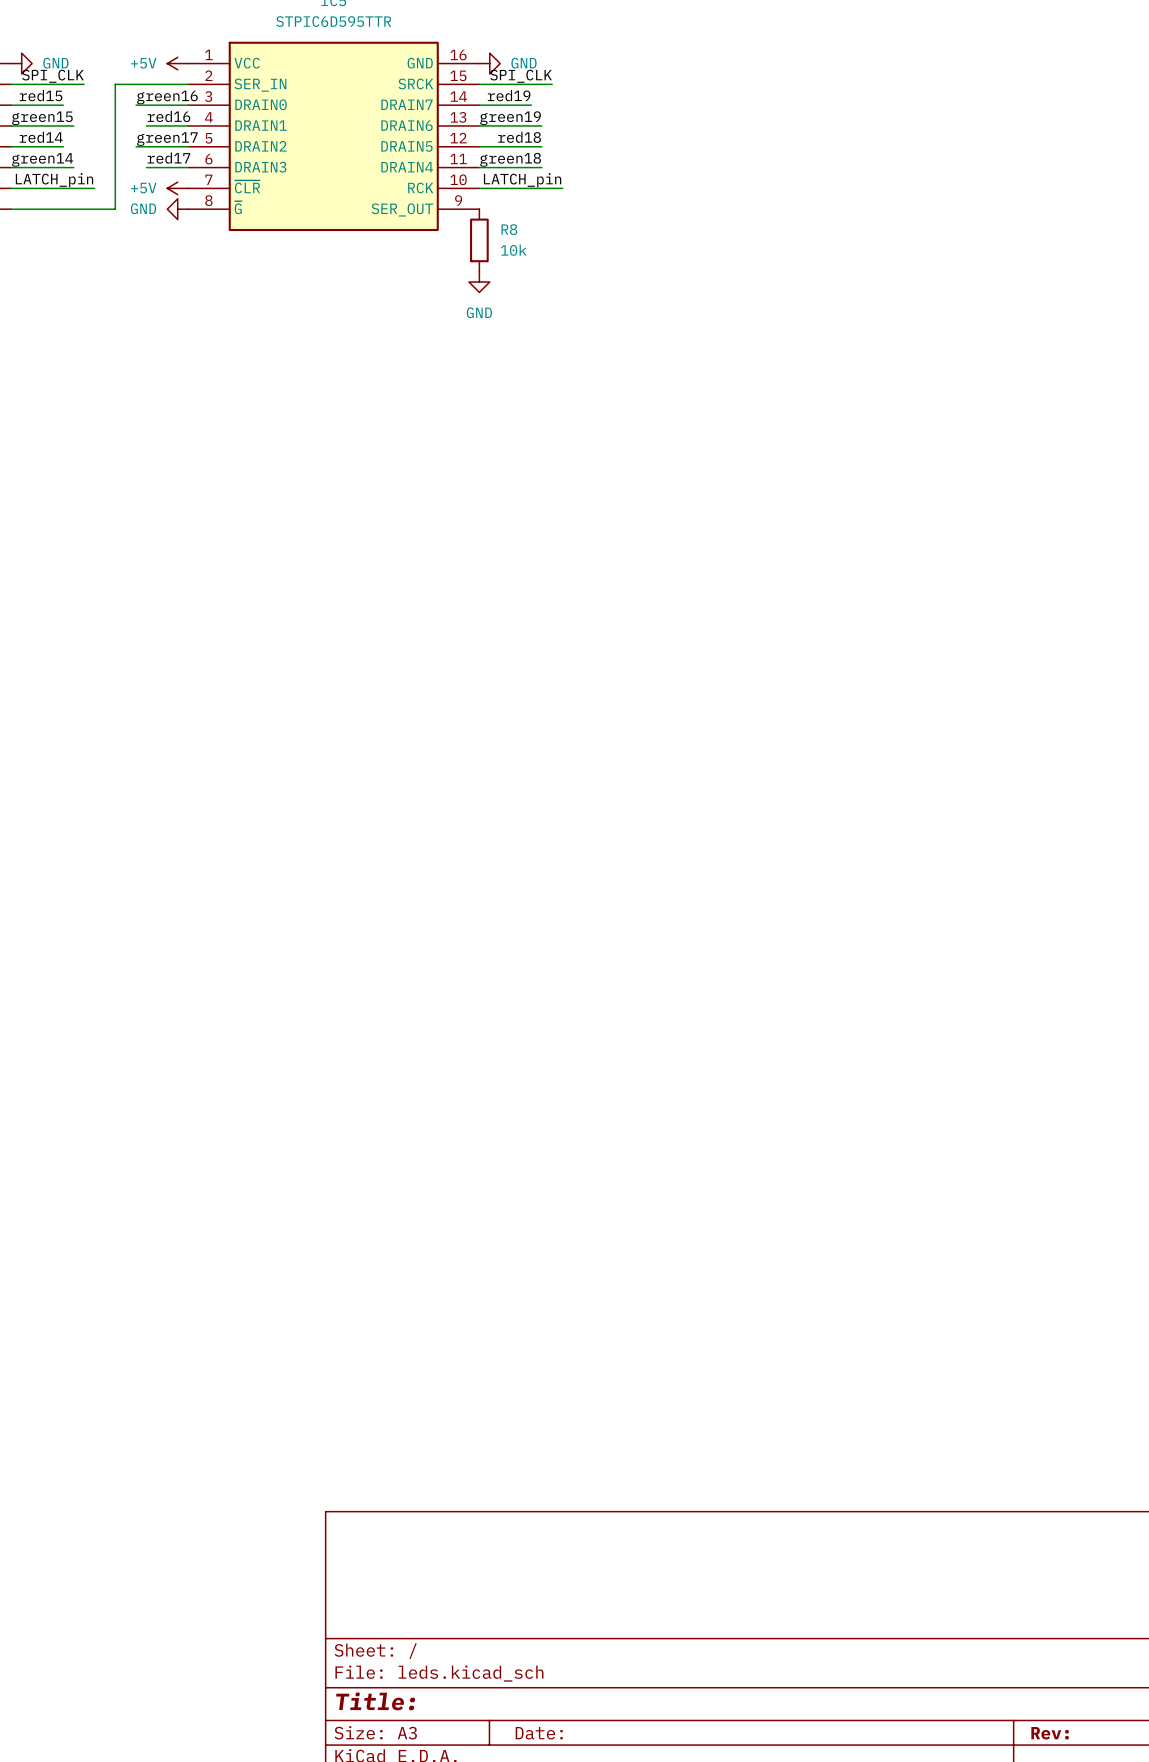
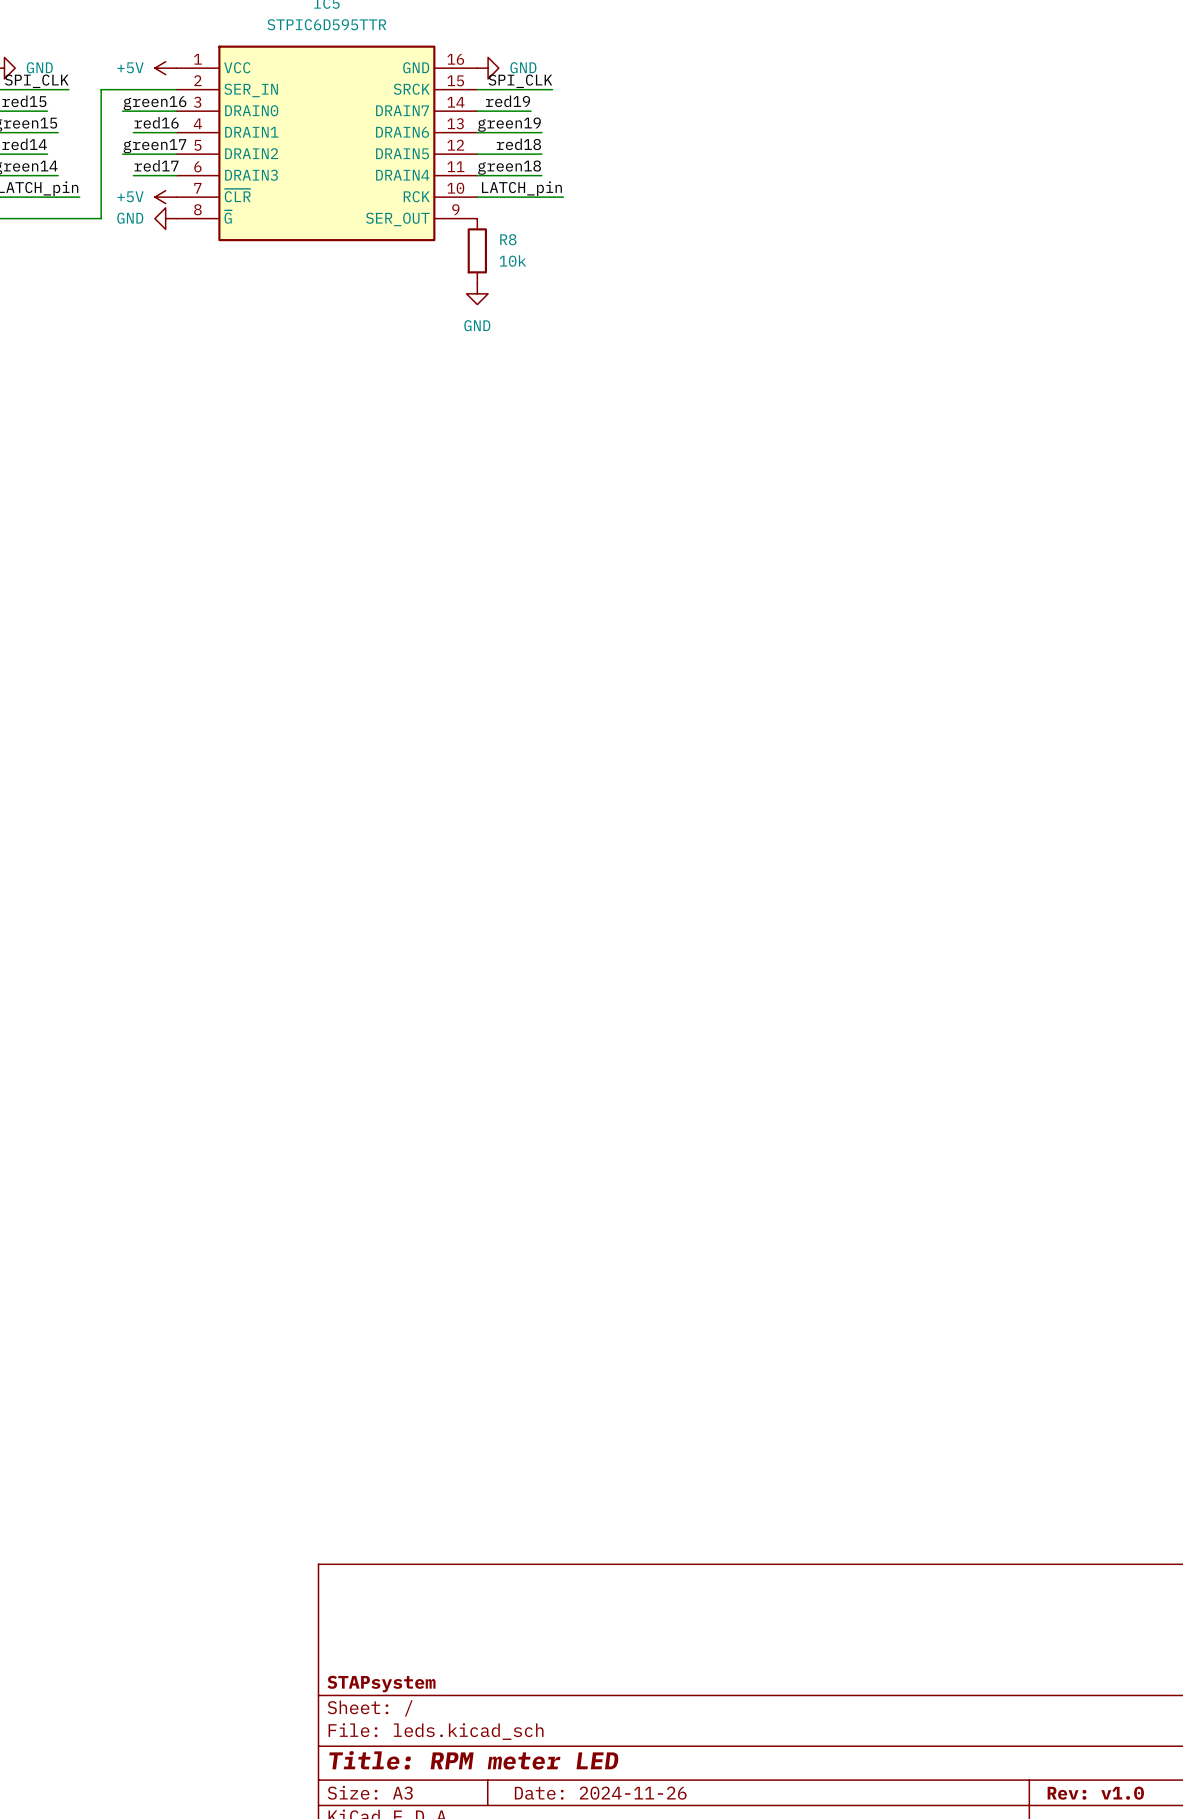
title block: none -> STAPsystem (381, 1684)
title block: Title: (375, 1701) -> Title: RPM meter LED (473, 1760)
title block: Date: (539, 1733) -> Date: 2024-11-26 (600, 1793)
title block: Rev: (1050, 1733) -> Rev: v1.0 (1095, 1793)

